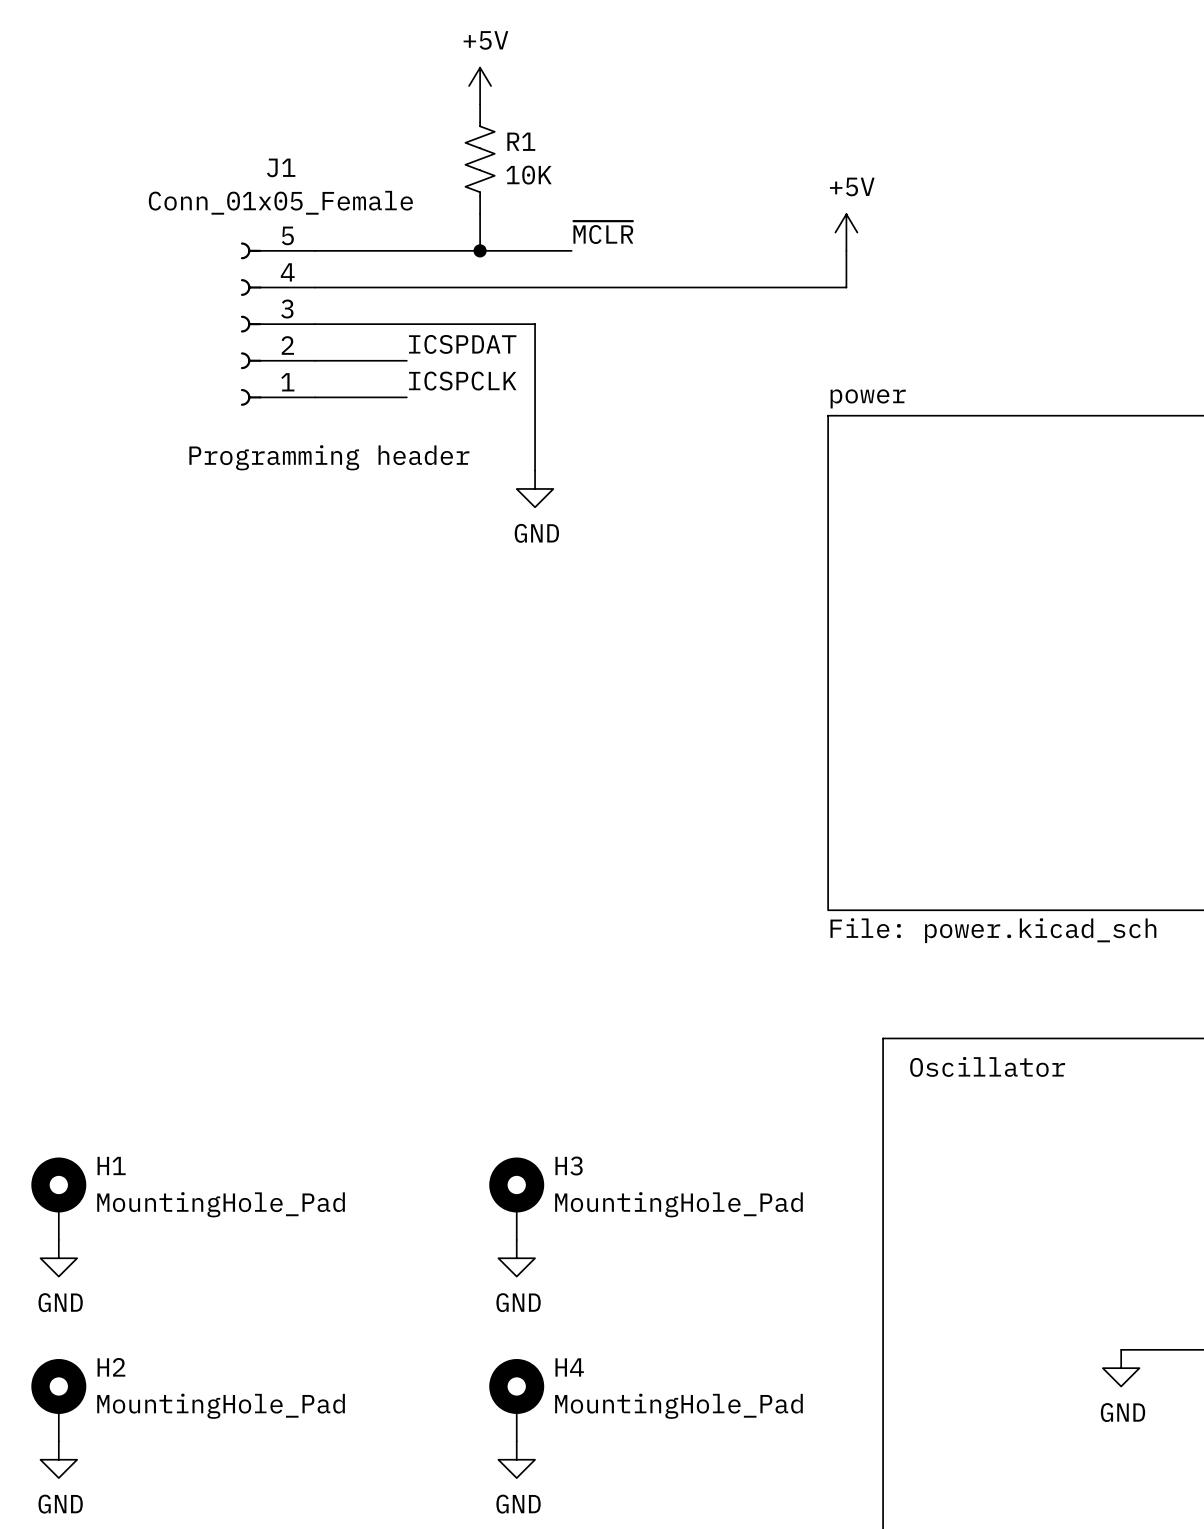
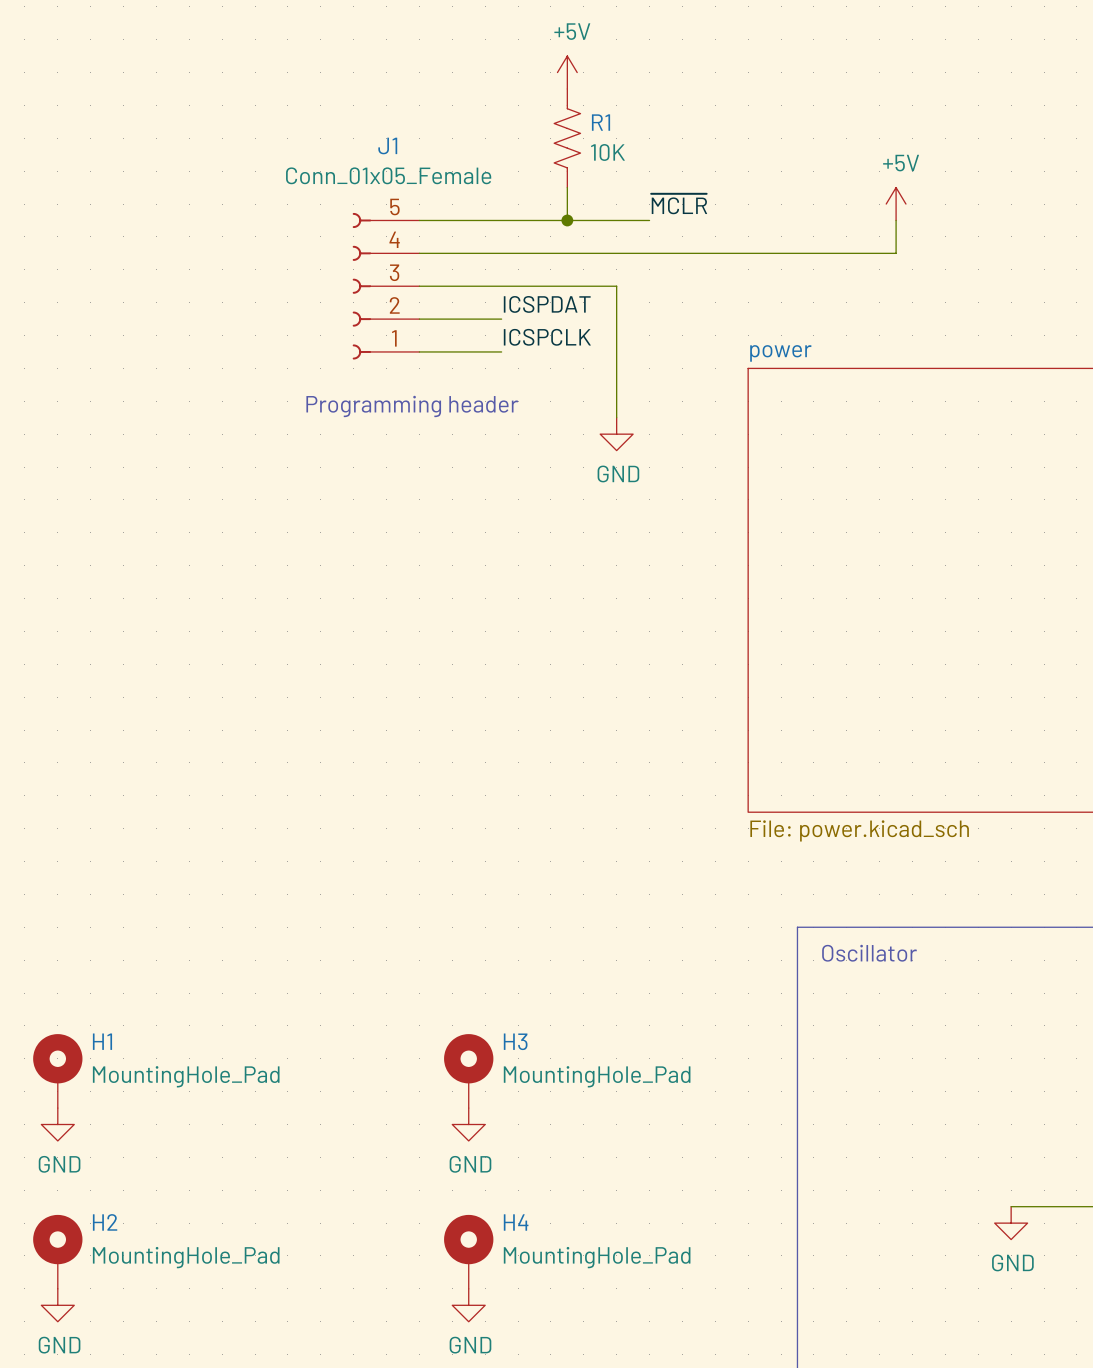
power symbol: +5V (480, 86) -> none
power symbol: none -> +5V (567, 72)
R1 position: (480, 159) -> (567, 138)
wire: (480, 214) (480, 250) -> (567, 187) (567, 220)
label position: ~{MCLR} (603, 232) -> ~{MCLR} (679, 204)
power symbol: +5V (846, 232) -> none
power symbol: none -> +5V (896, 204)
wire: (315, 250) (461, 250) -> (518, 220) (649, 220)
junction: (480, 250) -> none
junction: none -> (567, 220)
wire: (846, 250) (846, 287) -> (896, 220) (896, 253) (764, 253)
wire: (315, 287) (461, 287) -> none
J1 position: (278, 324) -> (386, 286)
wire: (315, 324) (461, 324) -> none
wire: (535, 324) (535, 470) -> (485, 286) (616, 286) (616, 417)
label position: ICSPDAT (462, 344) -> ICSPDAT (547, 304)
wire: (315, 360) (406, 360) -> (419, 319) (501, 319)
label position: ICSPCLK (462, 381) -> ICSPCLK (547, 337)
wire: (315, 397) (406, 397) -> (419, 351) (501, 351)
text position: Programming header (329, 457) -> Programming header (412, 406)
power symbol position: GND (535, 488) -> GND (616, 434)

